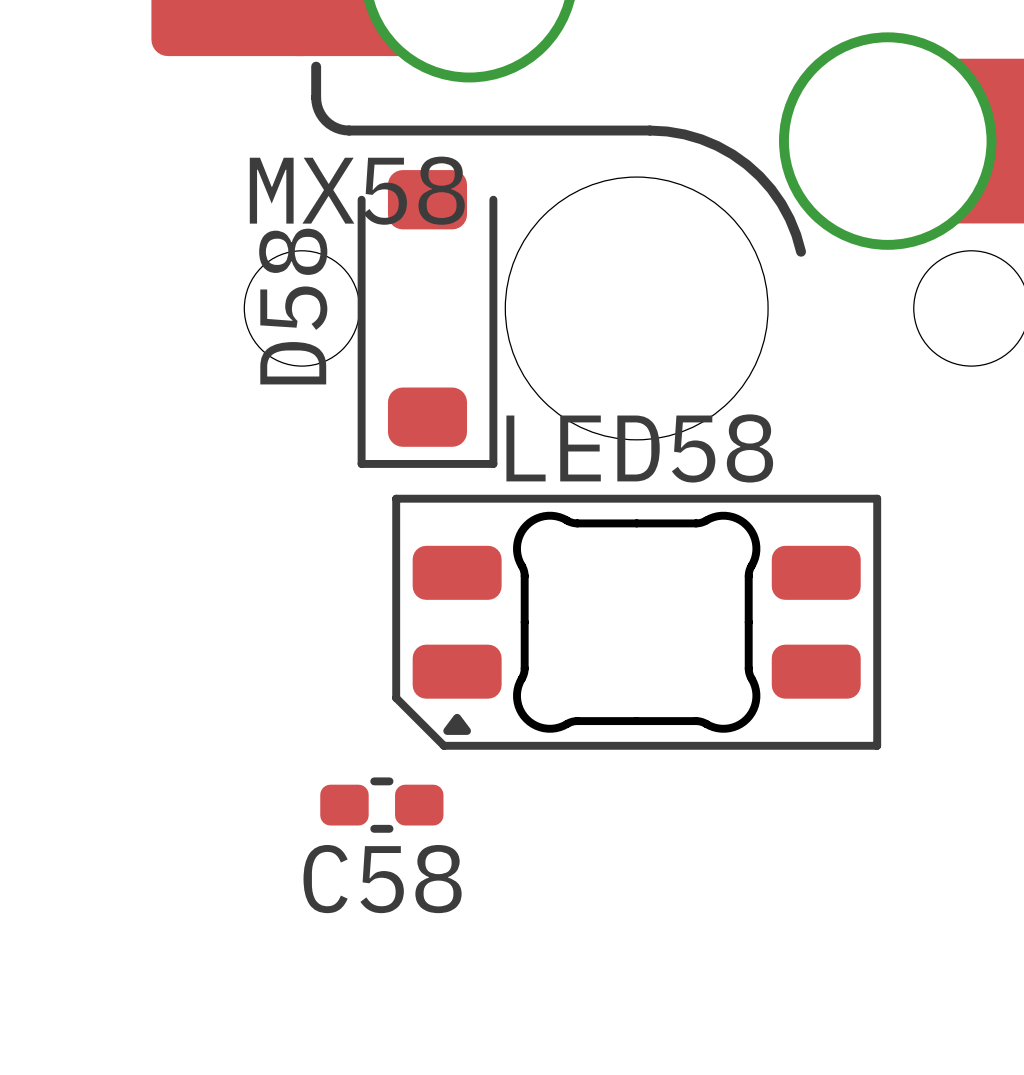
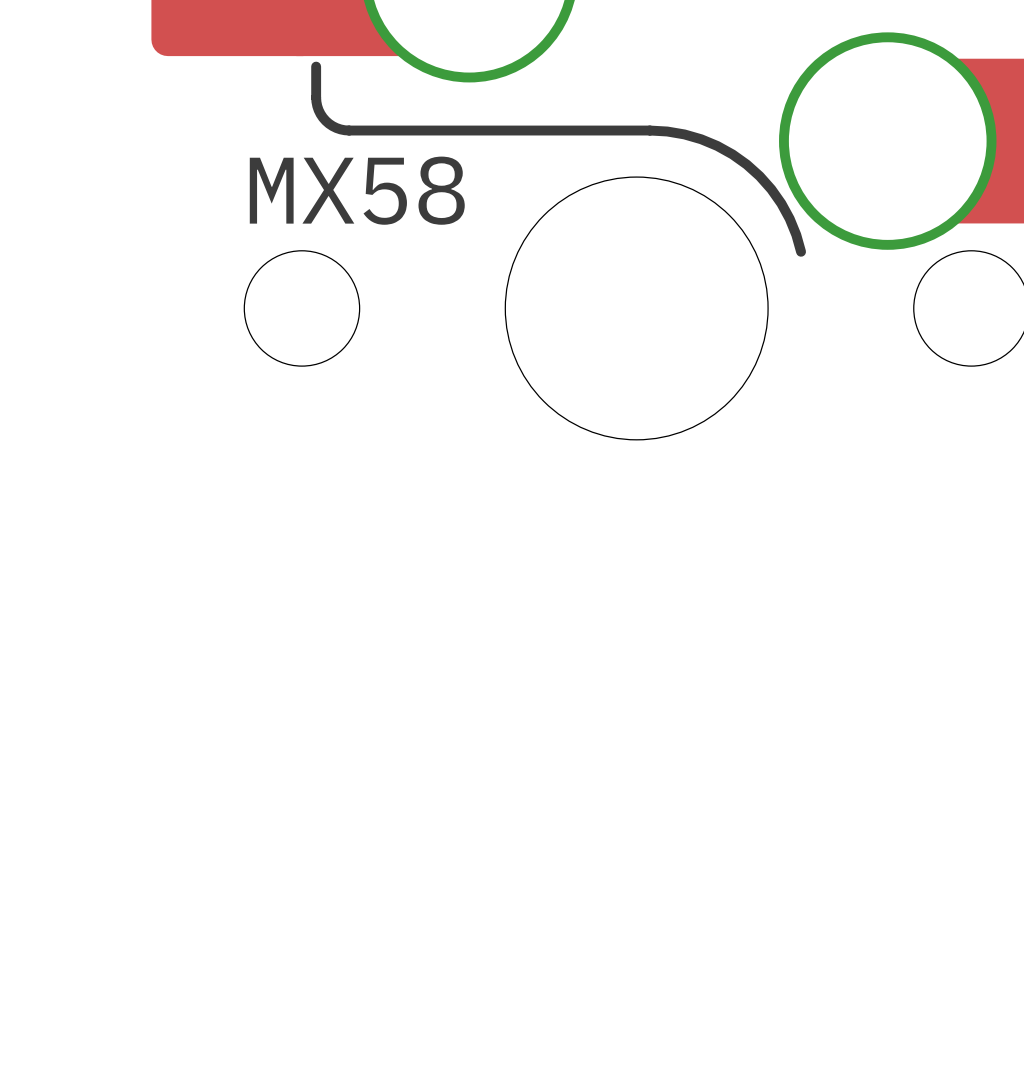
D58: (427, 318) -> none
LED58: (636, 622) -> none
C58: (381, 805) -> none

